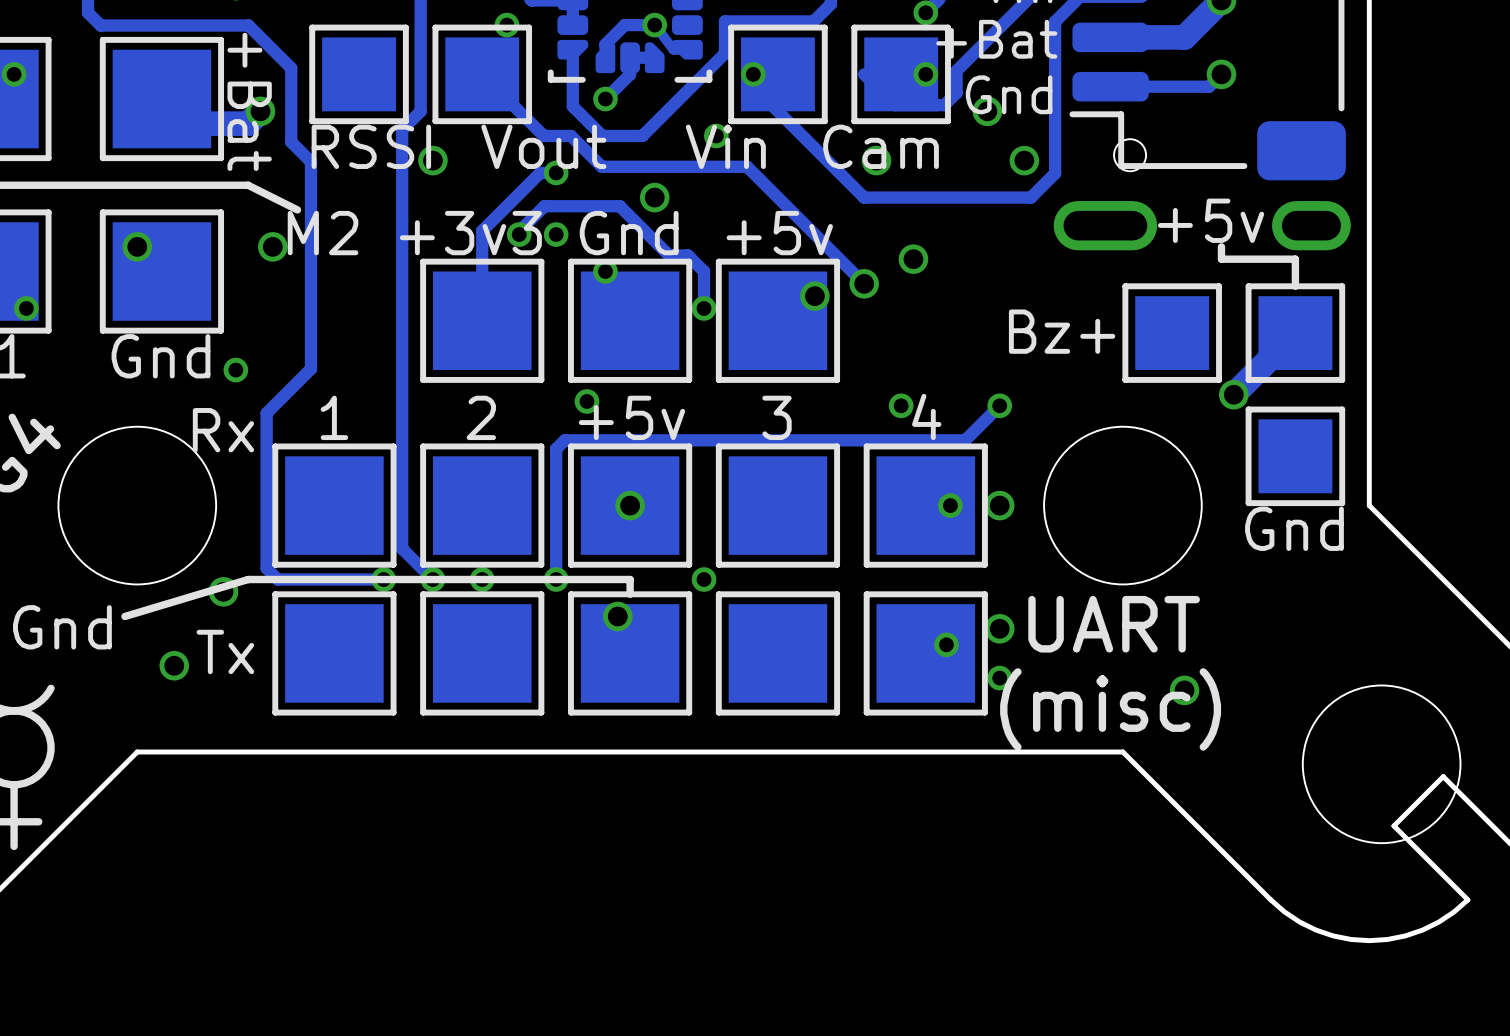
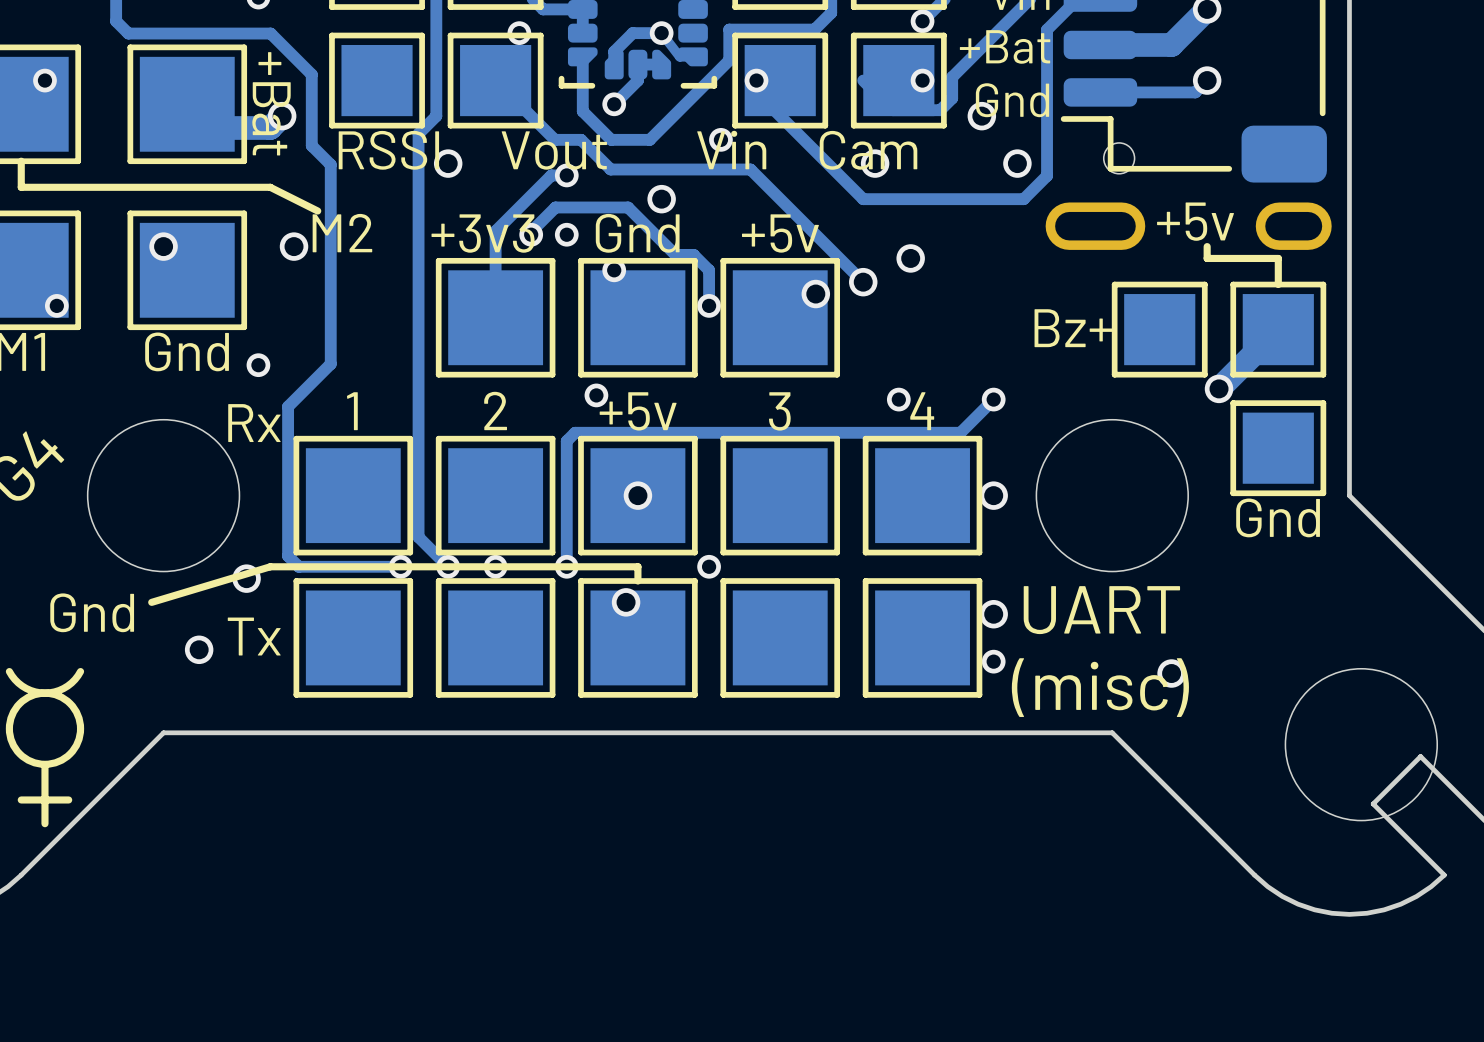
via: (950, 505) -> none
via: (946, 644) -> none

